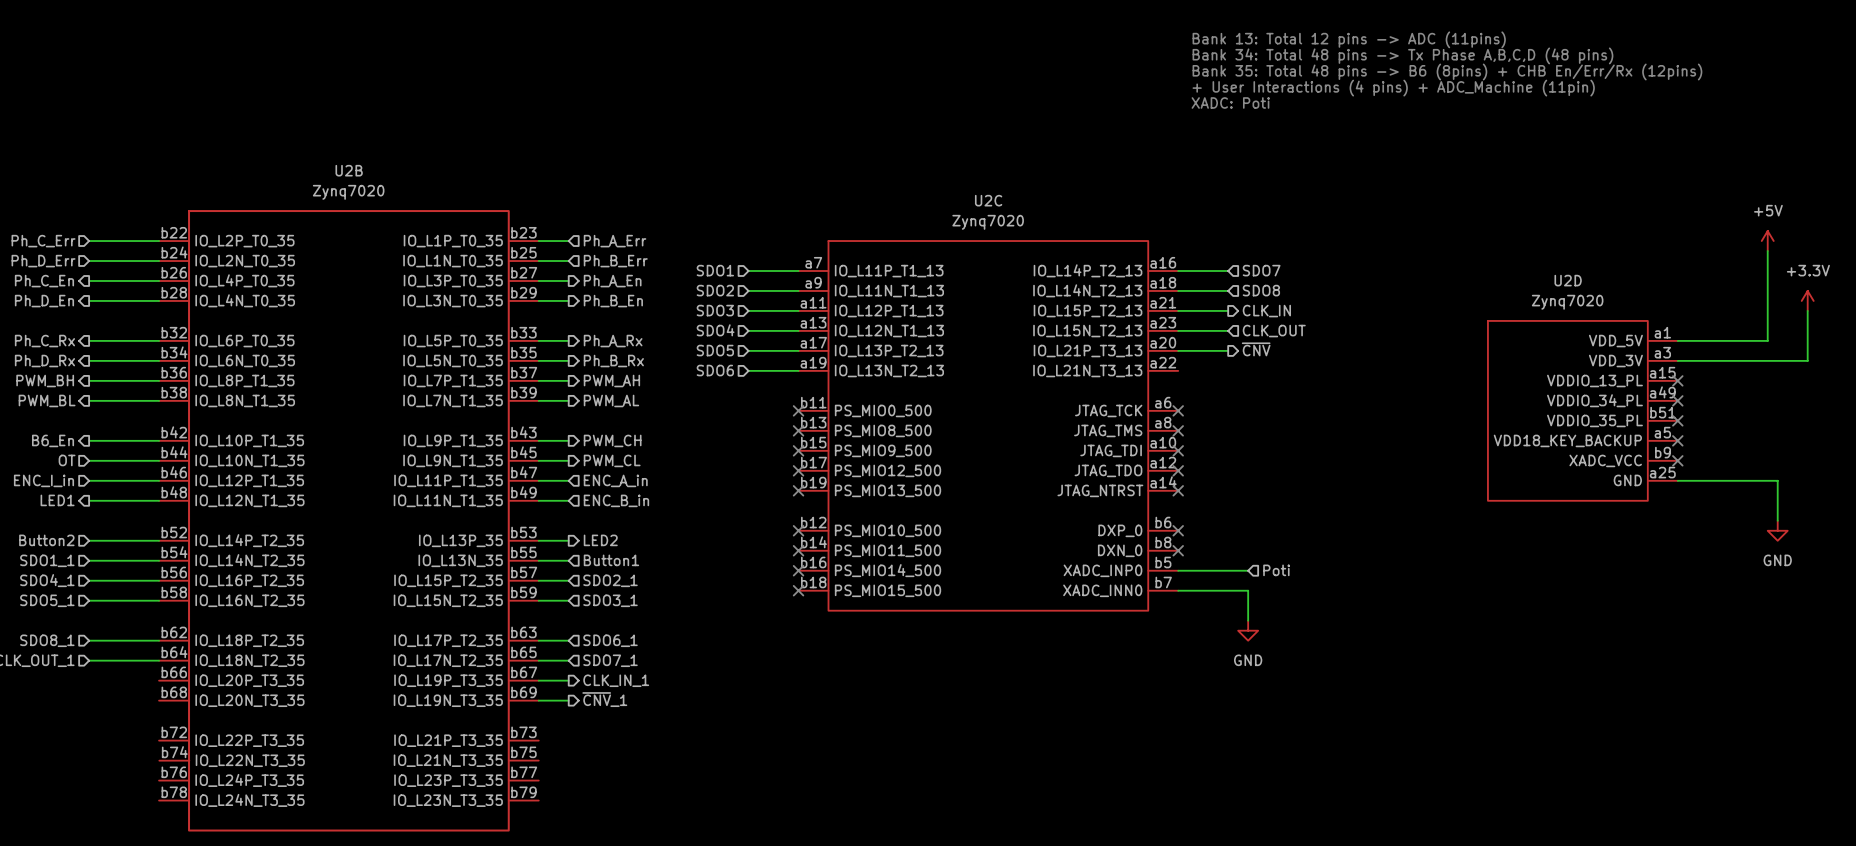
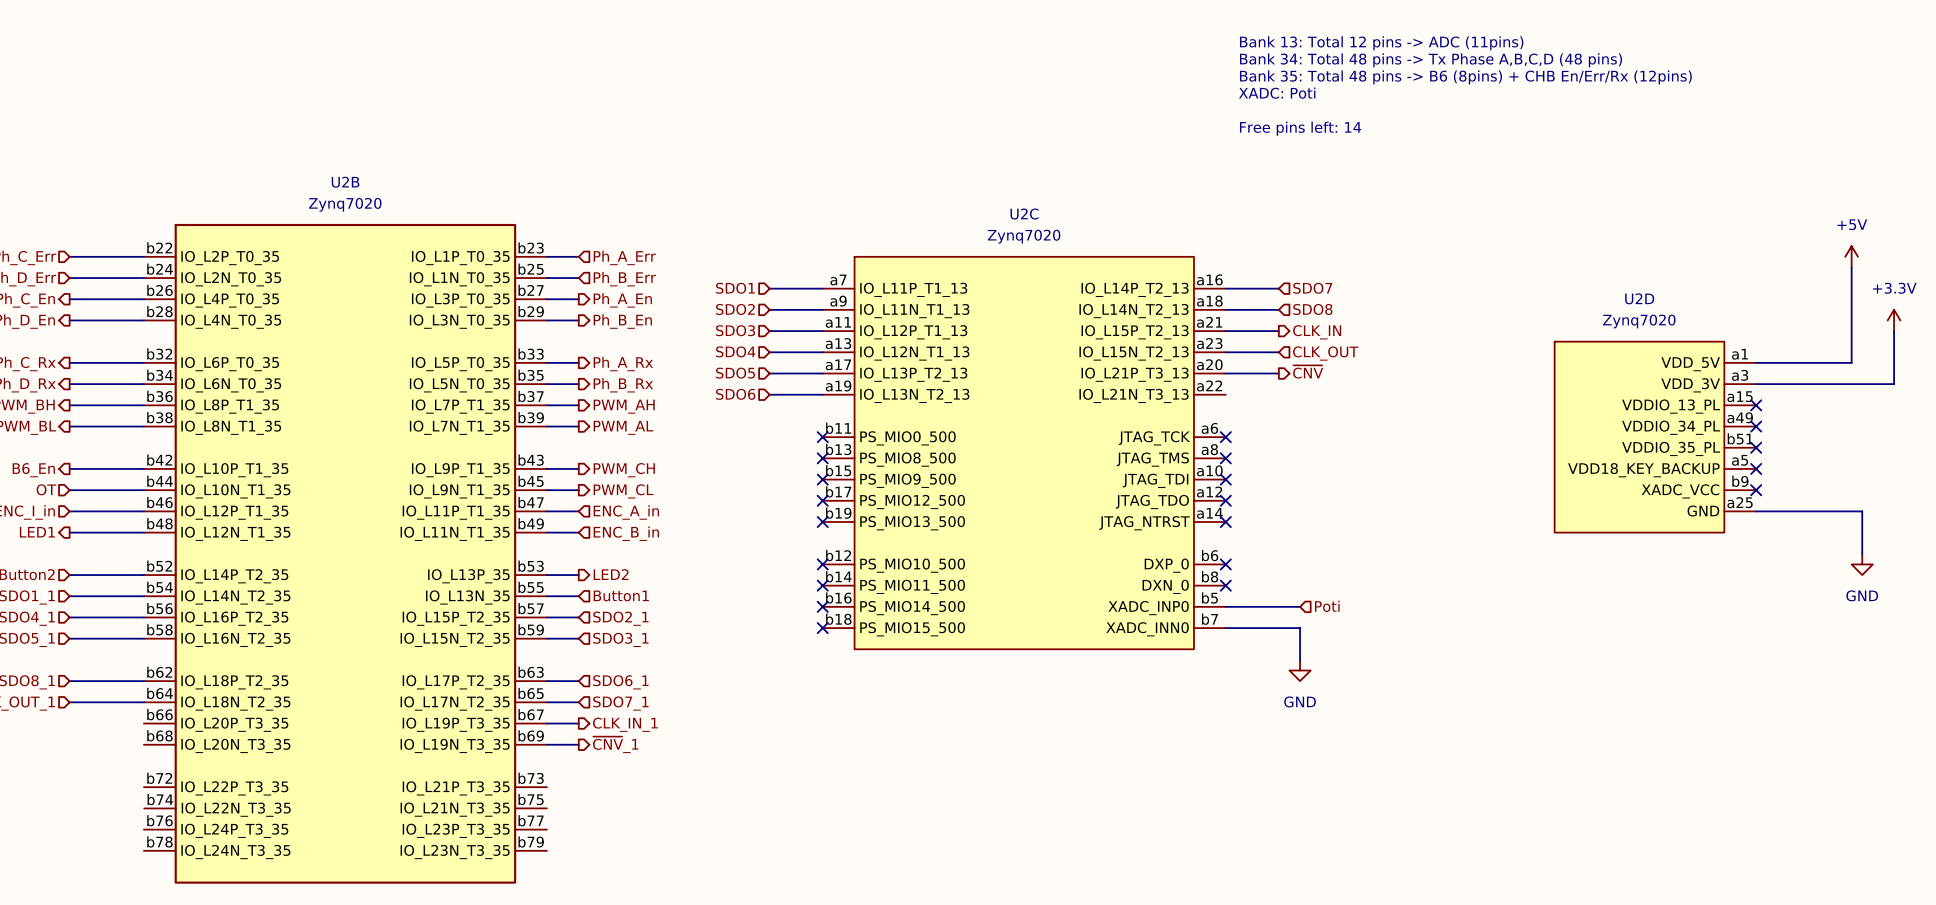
text: + User Interactions (4 pins) + ADC_Machine (11pin) (1393, 88) -> XADC: Poti (1277, 93)
text: XADC: Poti (1230, 102) -> none
text: none -> Free pins left: 14 (1300, 128)

